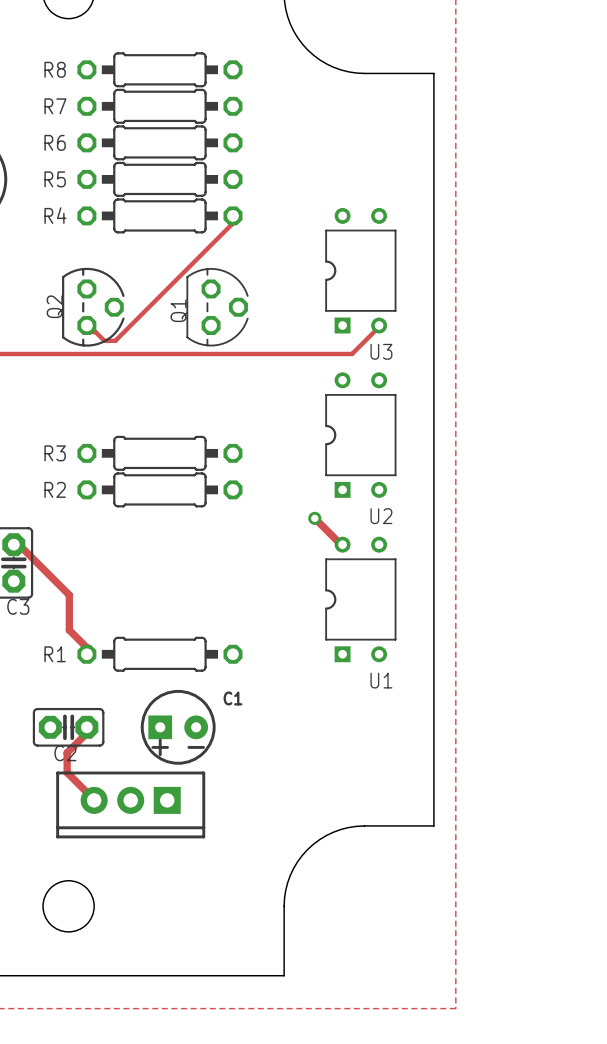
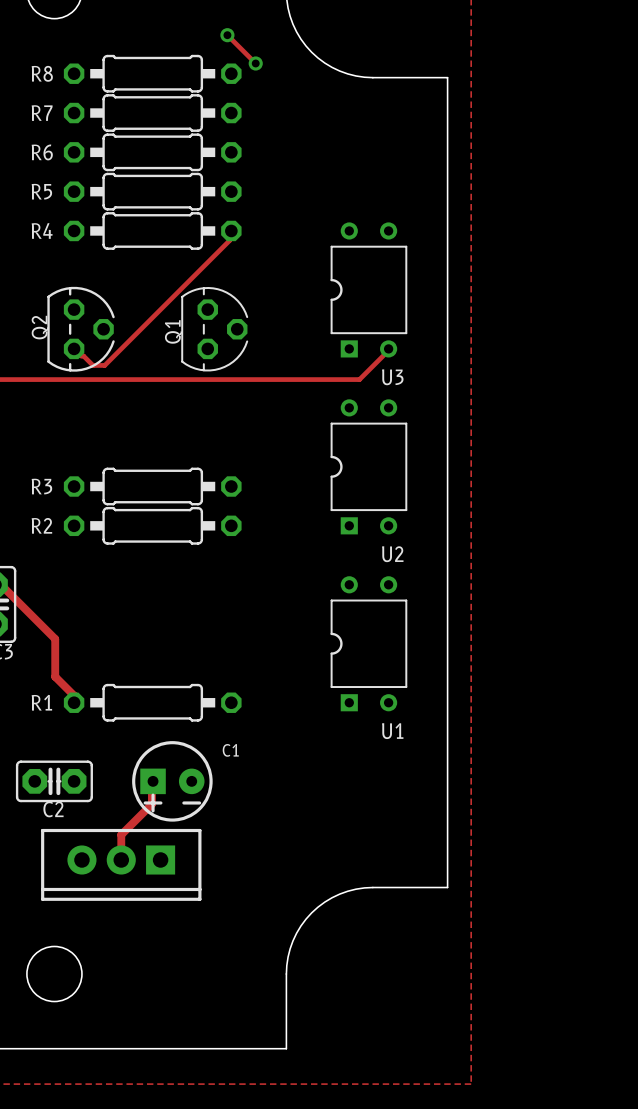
track: none -> (227, 35) (255, 63)
via: none -> (227, 35)
via: none -> (255, 63)
track: (314, 518) (342, 544) -> none
via: (314, 518) -> none
track: (86, 727) (86, 733) (67, 752) (67, 772) (94, 800) -> none
track: none -> (153, 781) (151, 804) (121, 834) (121, 859)

